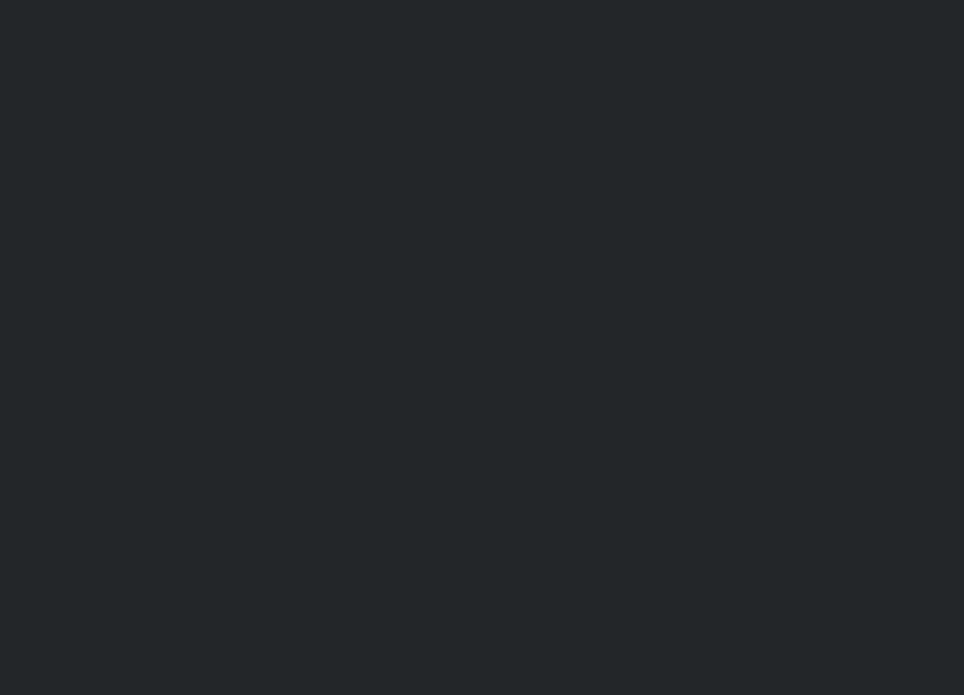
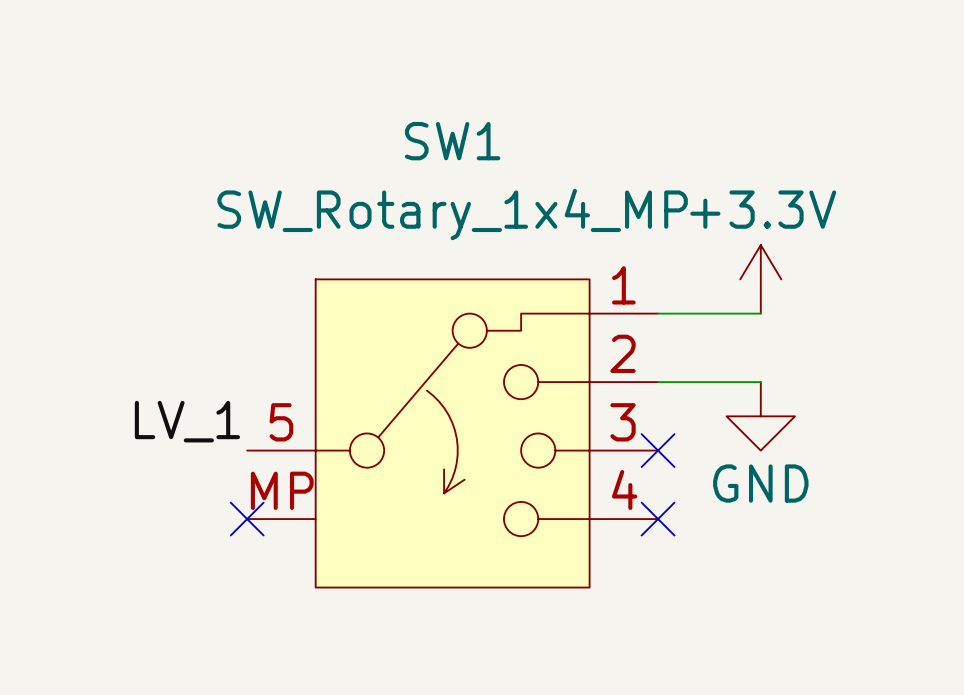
power symbol: none -> +3.3V (760, 279)
wire: none -> (658, 313) (760, 313)
wire: none -> (658, 382) (760, 382)
power symbol: none -> GND (760, 416)
label: none -> LV_1 (187, 421)
SW1: none -> SW_Rotary_1x4_MP (452, 433)
no-connect mark: none -> (658, 450)
no-connect mark: none -> (247, 519)
no-connect mark: none -> (658, 519)

